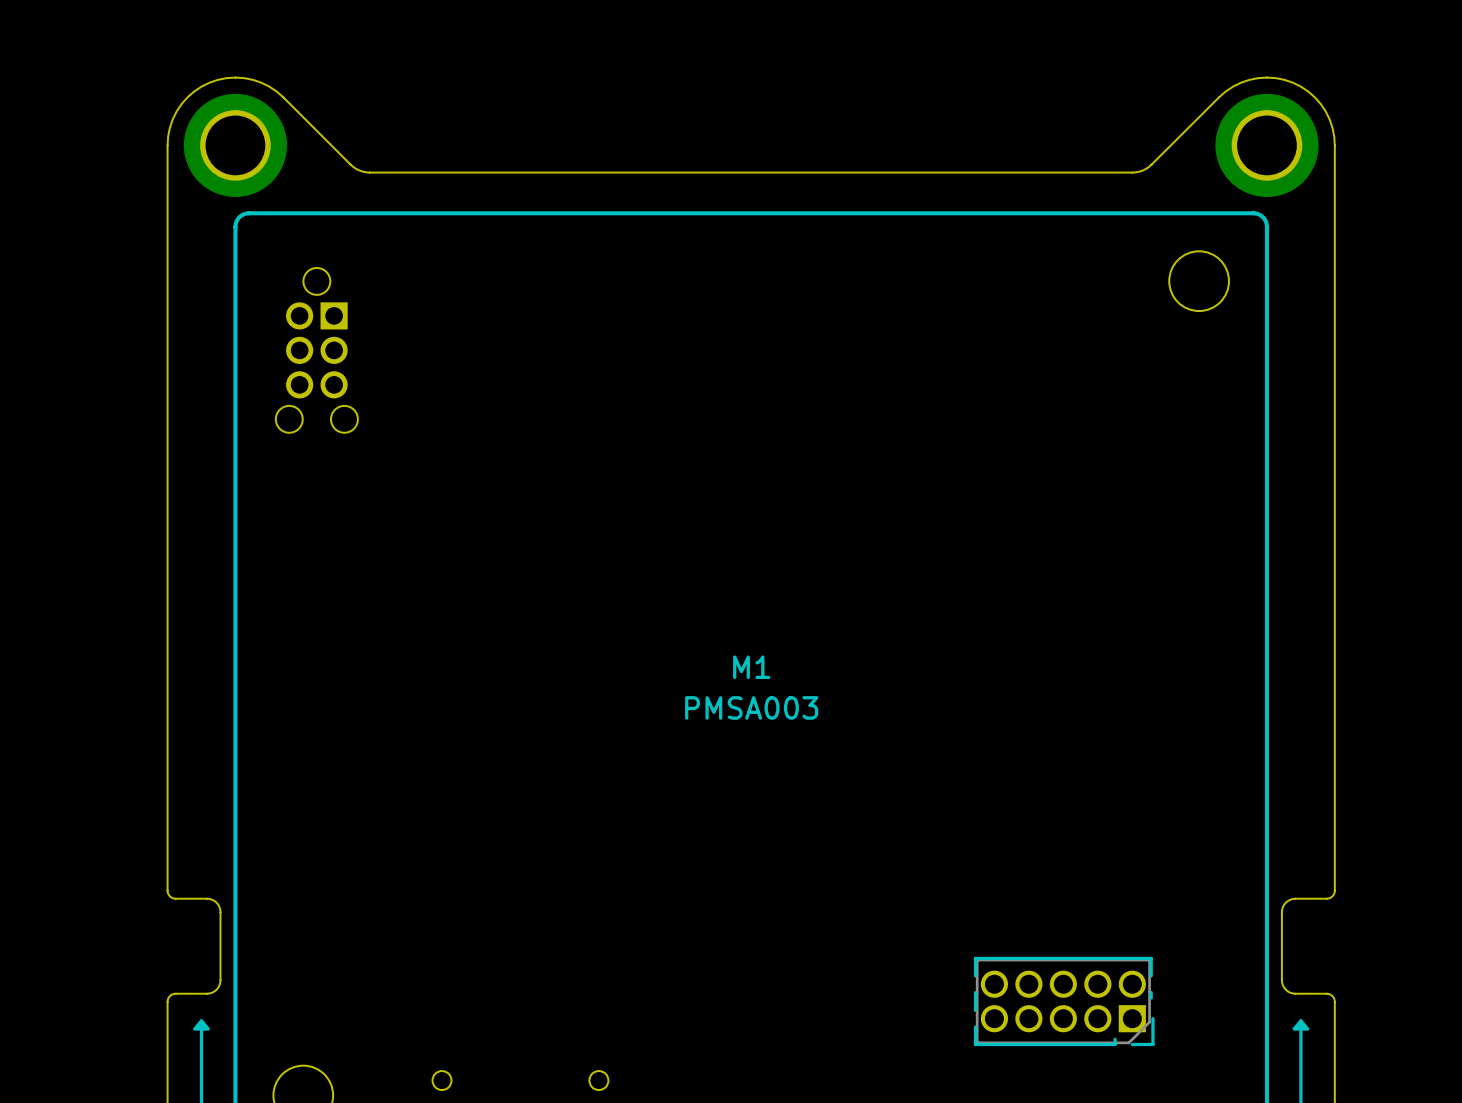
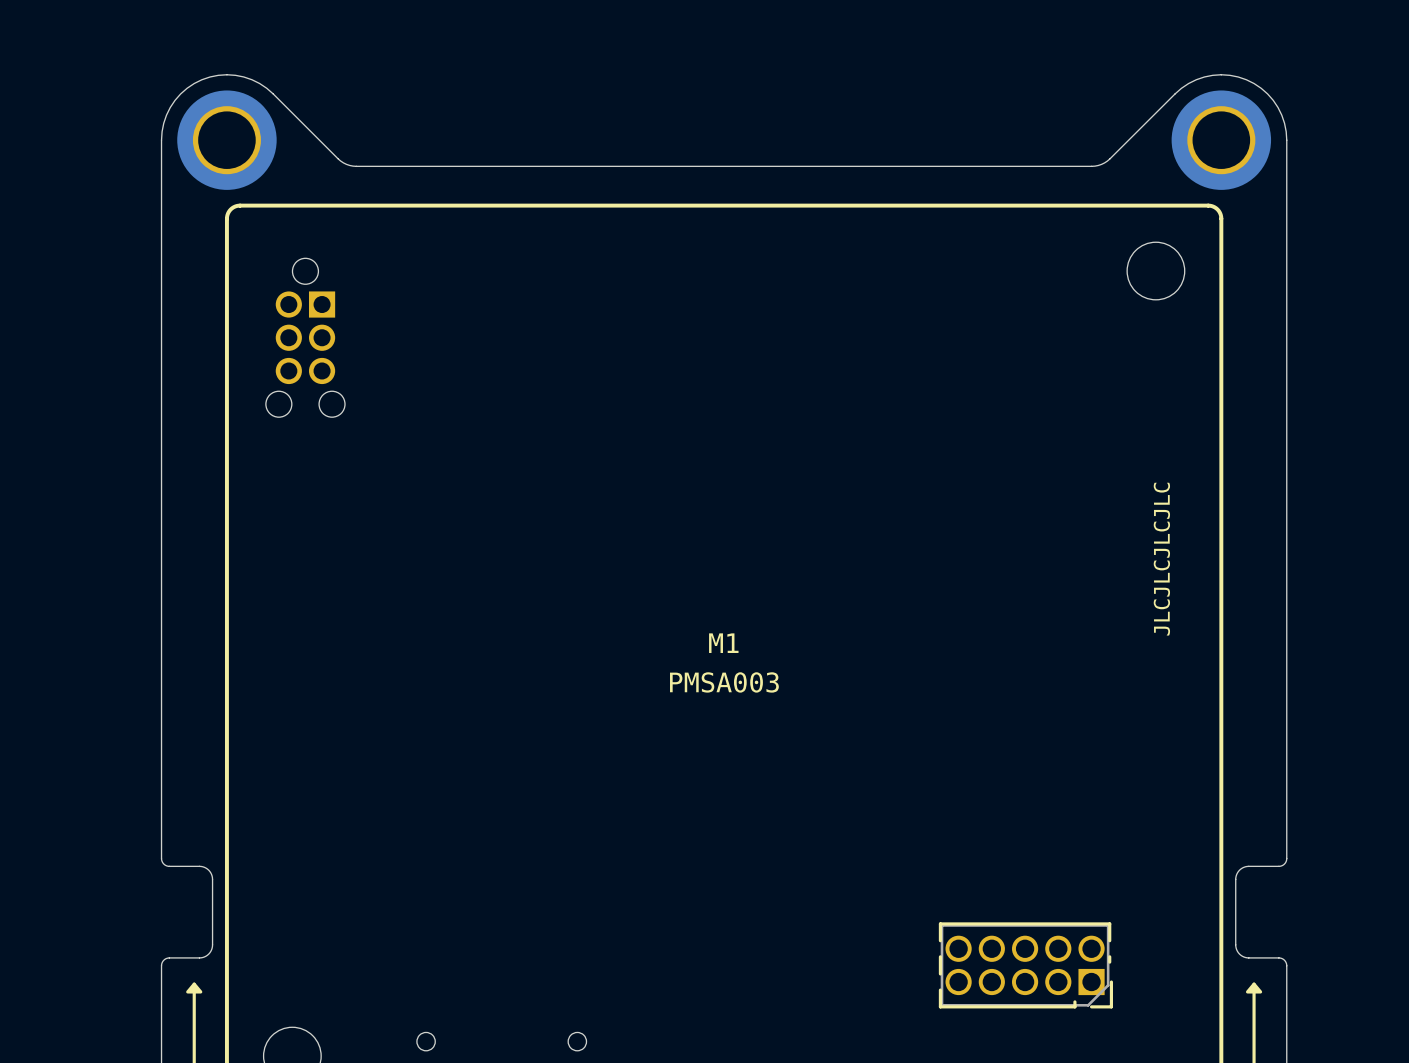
text: none -> JLCJLCJLCJLC (1161, 559)

